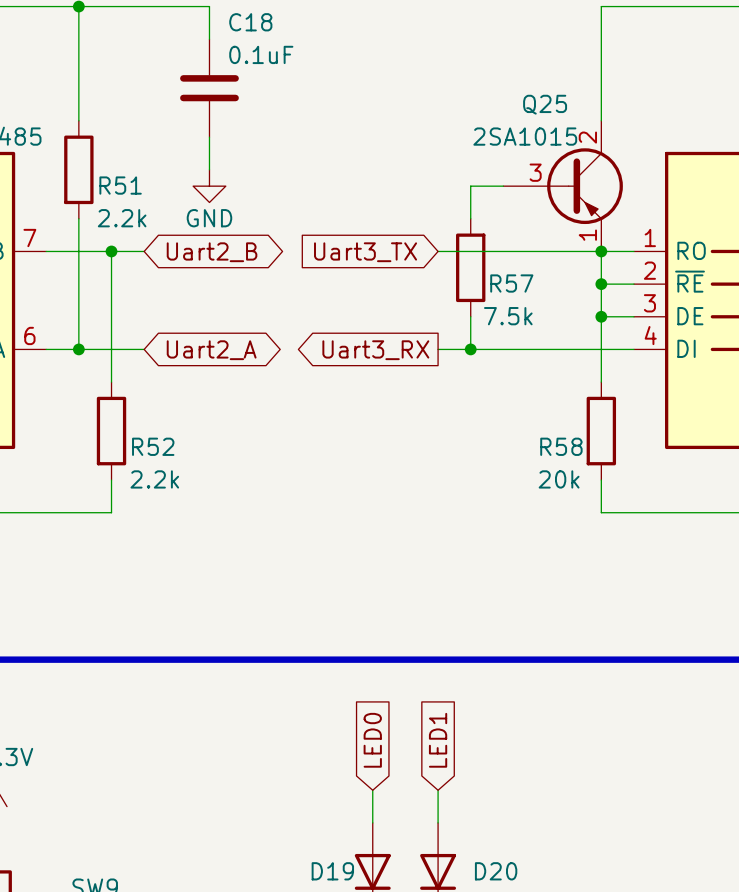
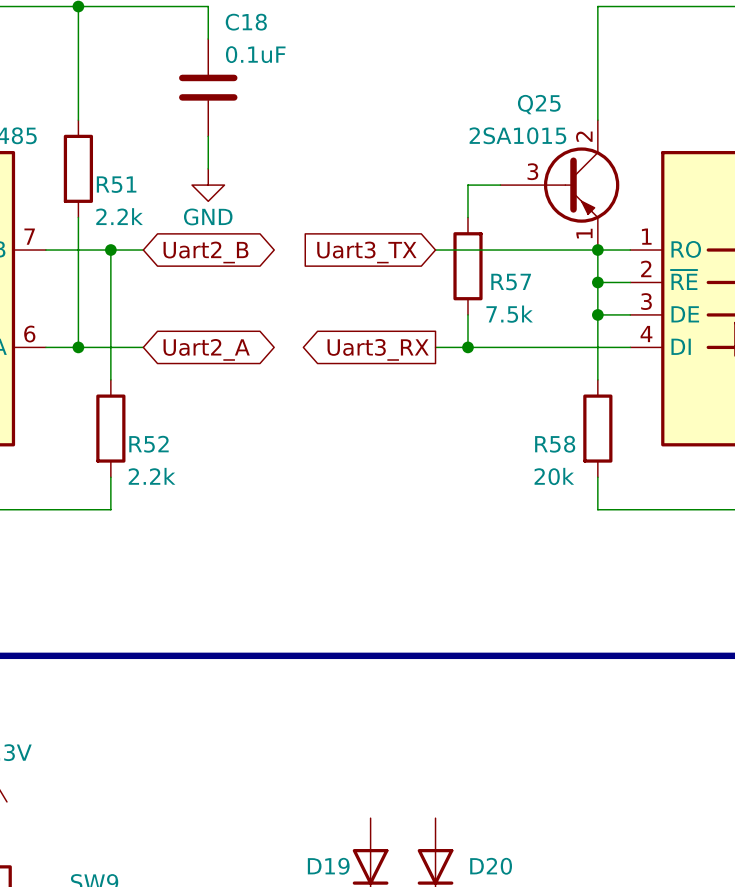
global label: LED0 (372, 740) -> none
global label: LED1 (438, 740) -> none
wire: (372, 790) (372, 822) -> none
wire: (438, 790) (438, 822) -> none

